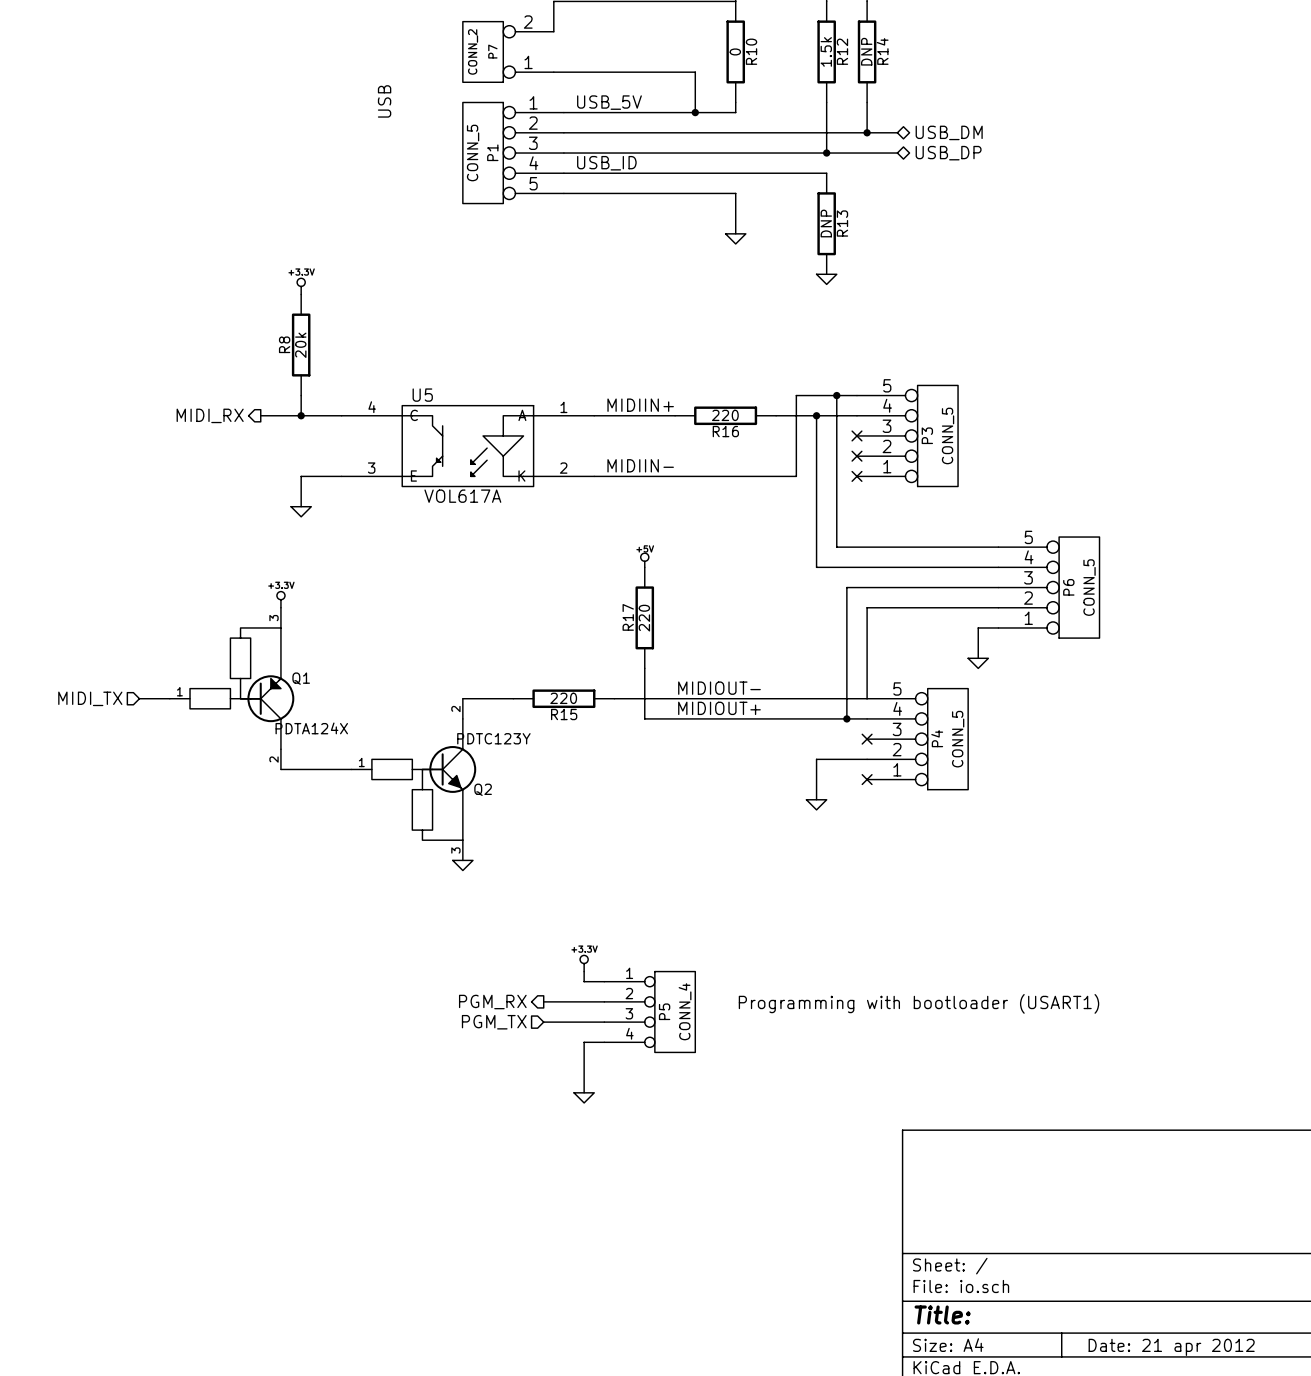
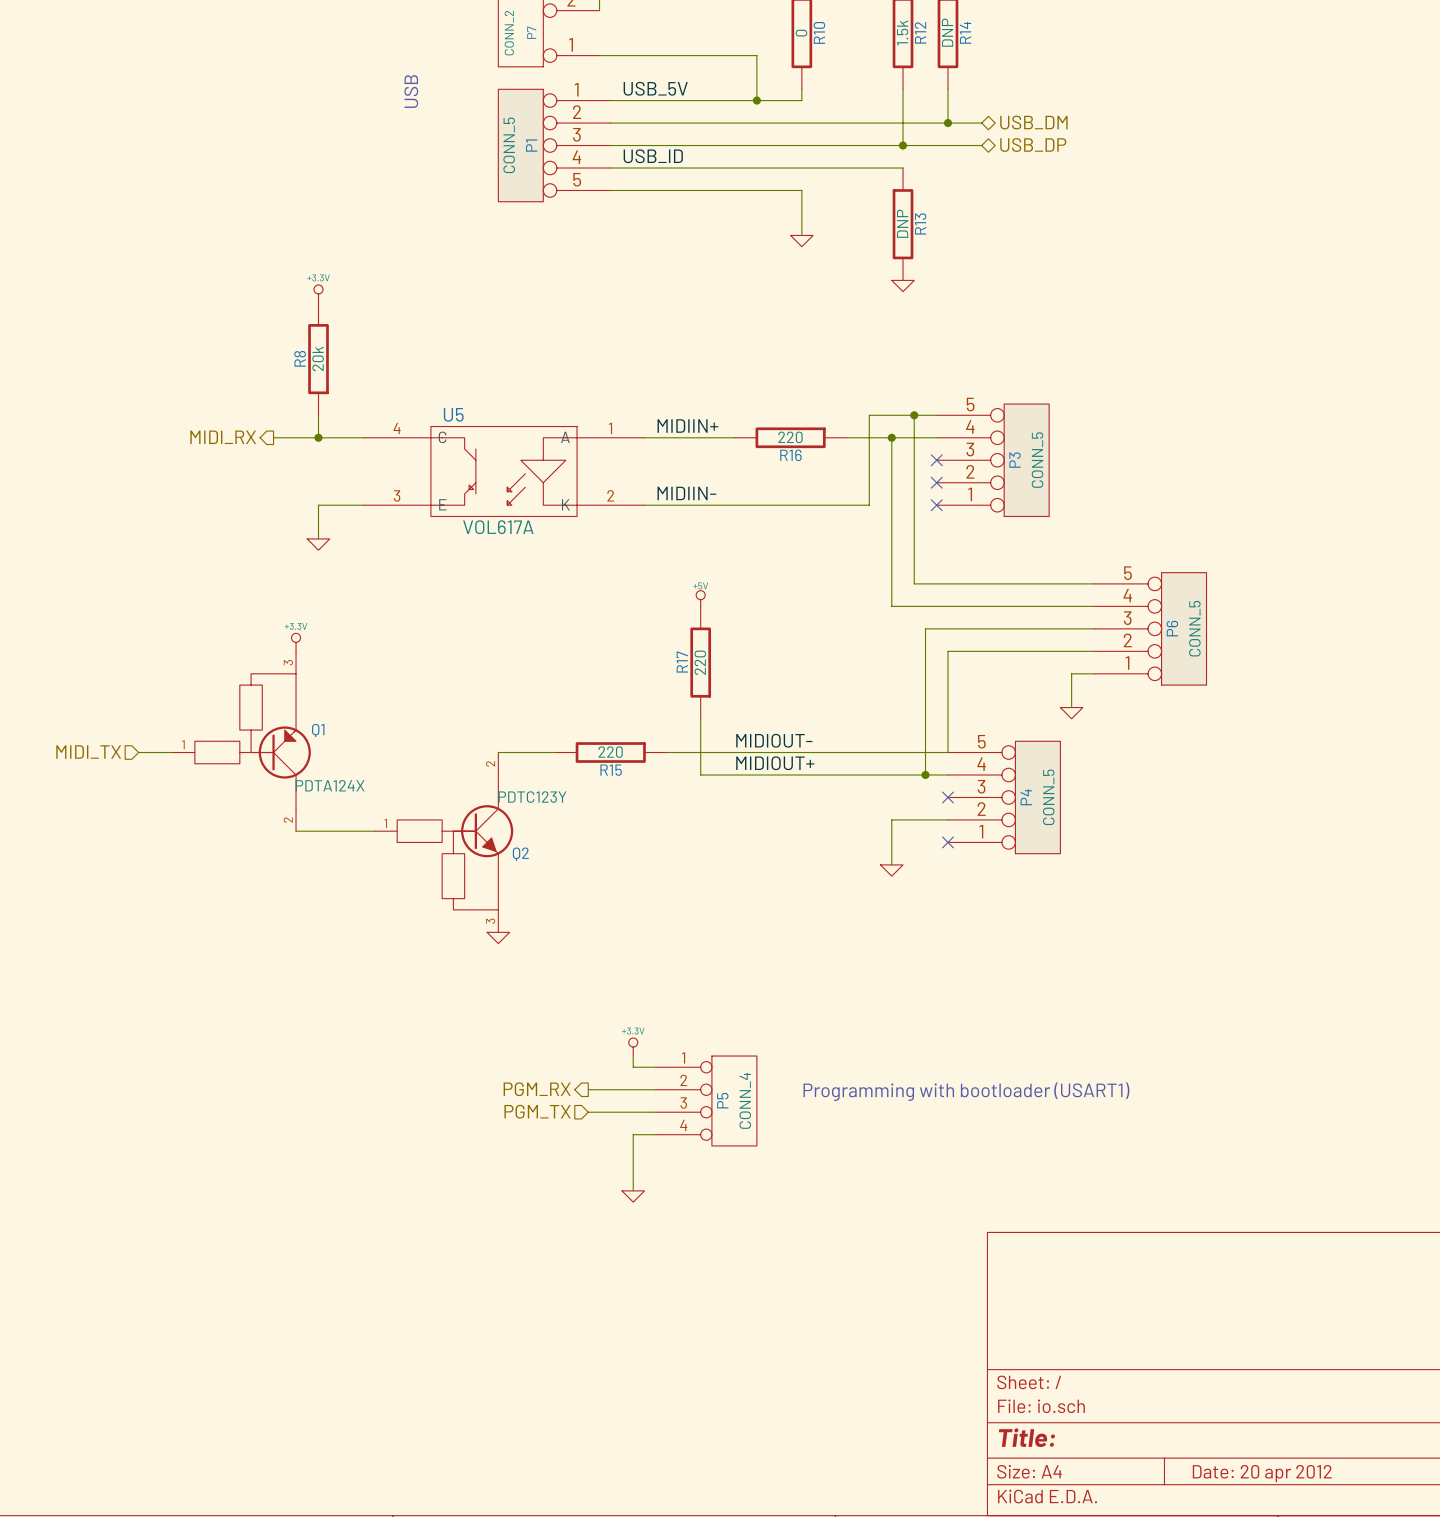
title block: Date: 21 apr 2012 (1171, 1347) -> Date: 20 apr 2012 (1262, 1473)

